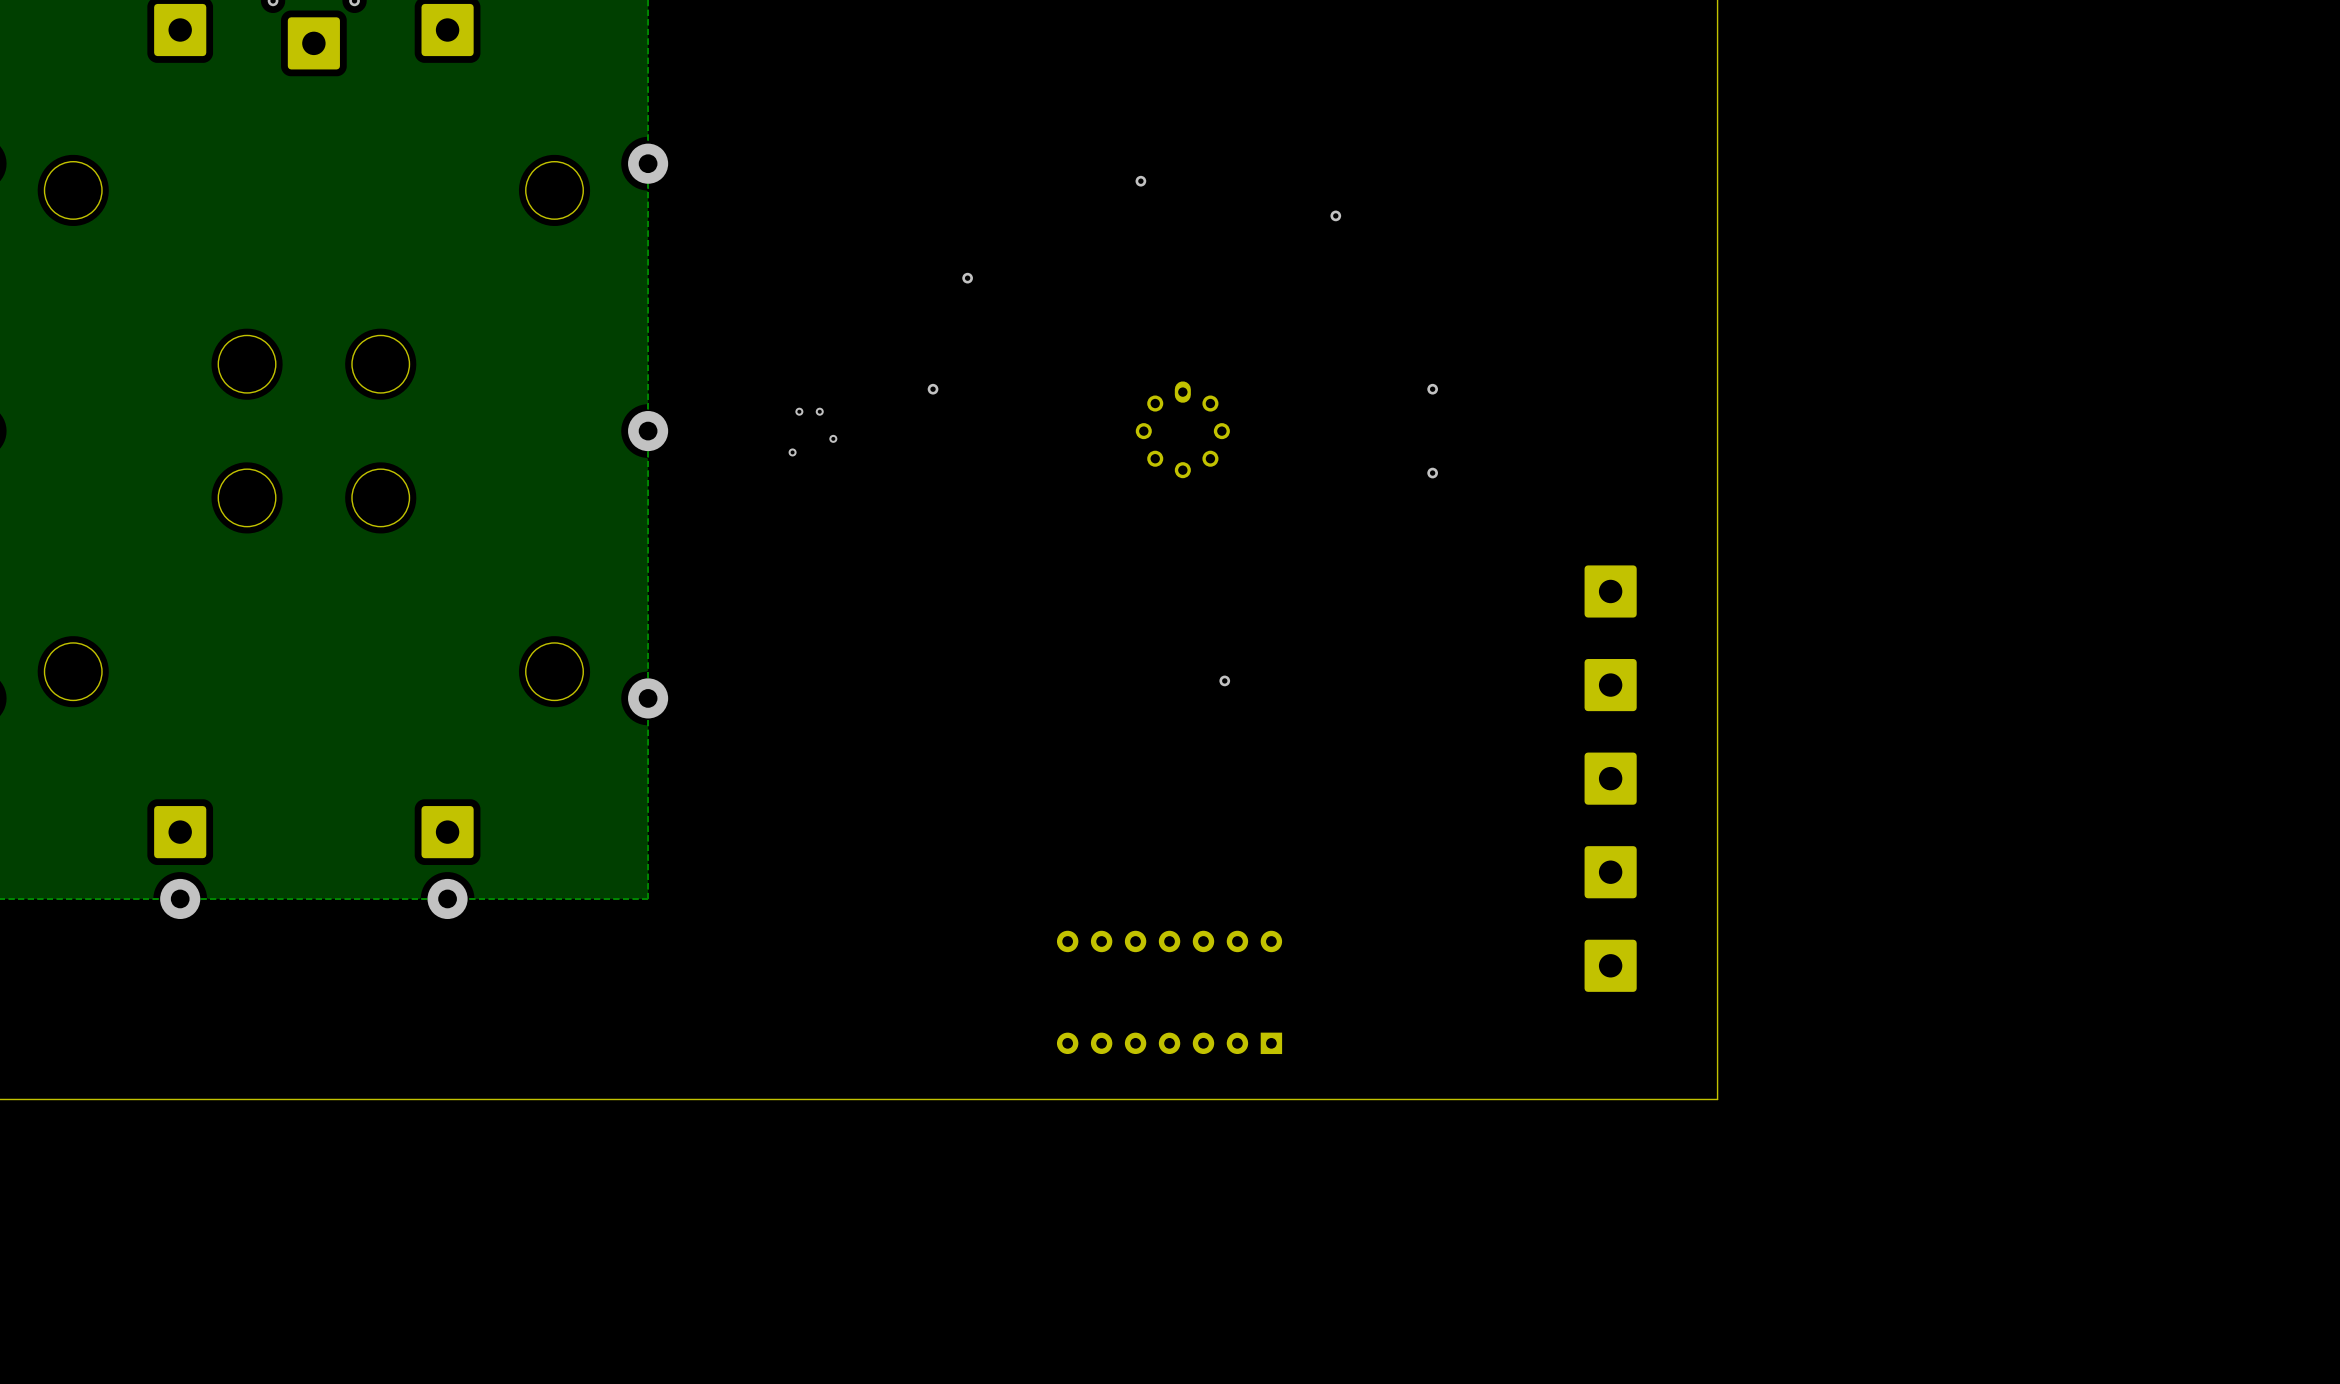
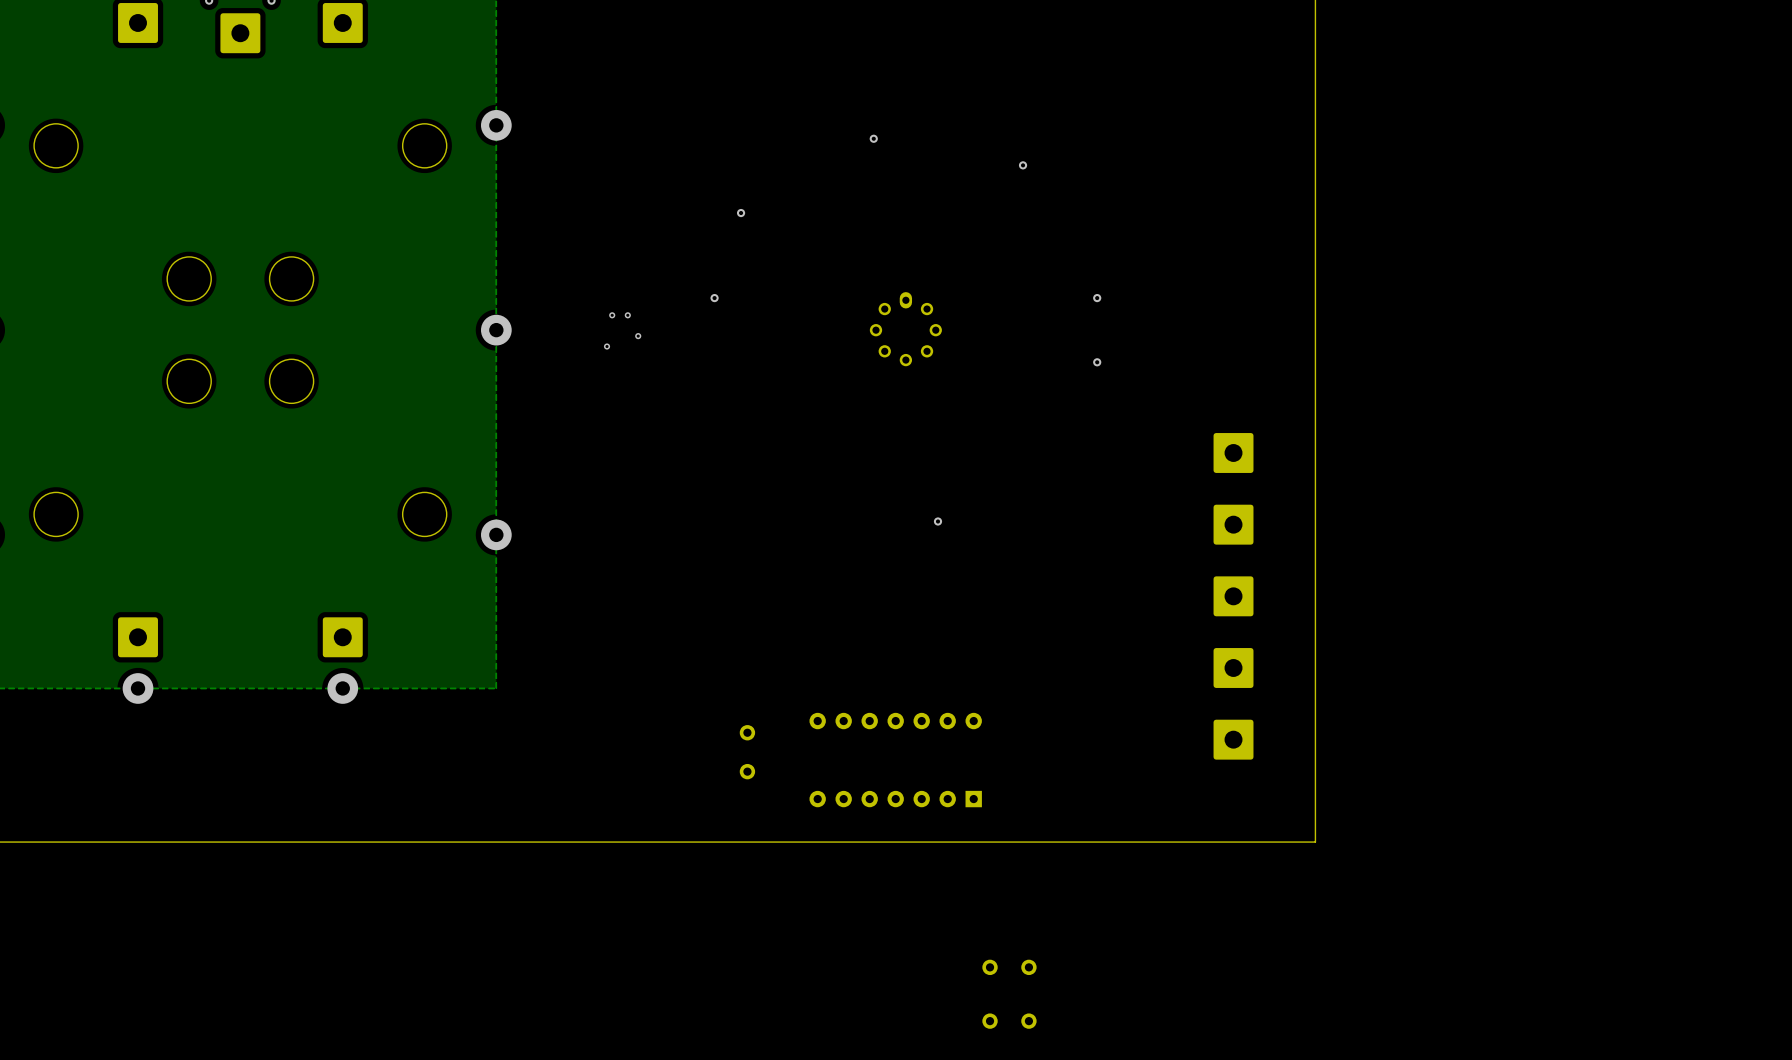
part: none -> (747, 752)
part: none -> (1009, 967)
part: none -> (1009, 1021)

